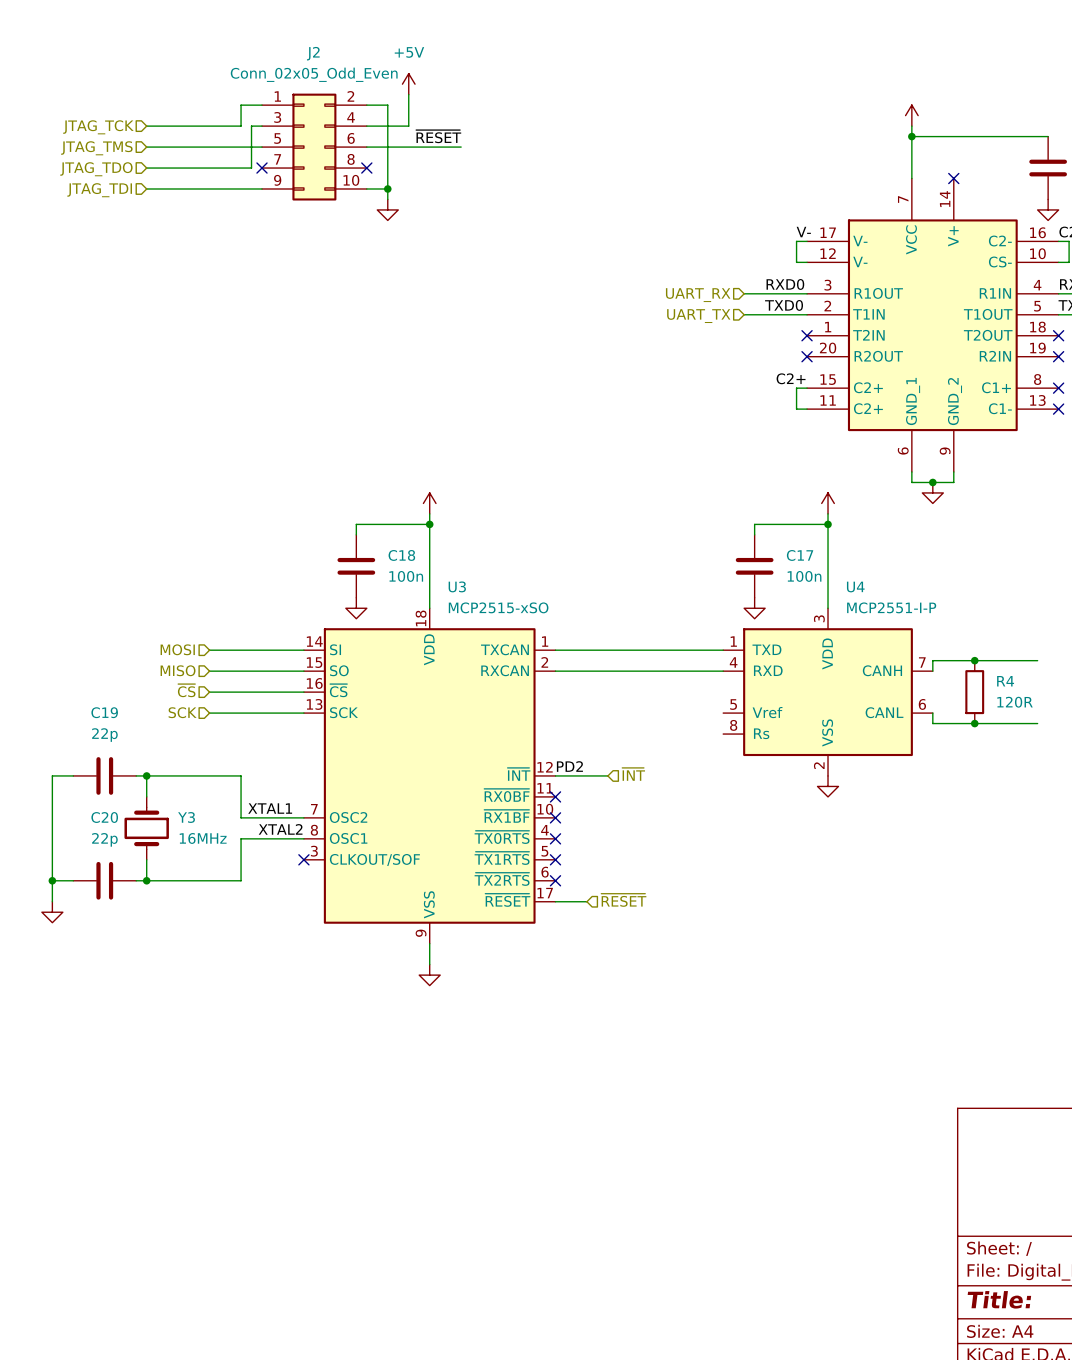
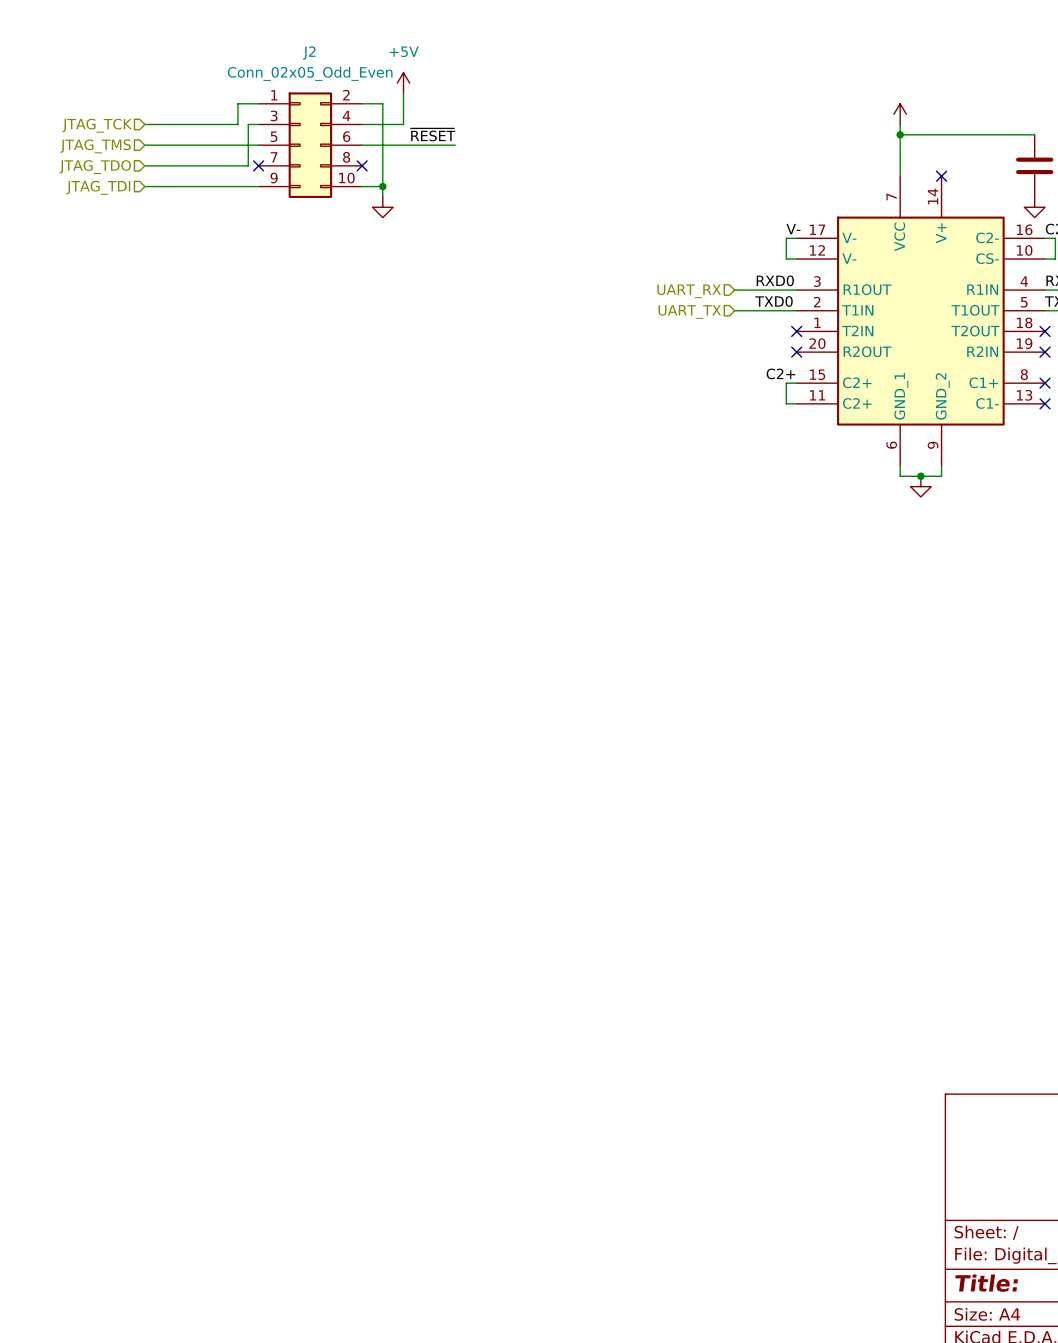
power symbol: (429, 503) -> none
power symbol: (828, 503) -> none
wire: (429, 513) (429, 608) -> none
wire: (828, 513) (828, 608) -> none
wire: (429, 524) (356, 524) (356, 534) -> none
junction: (429, 524) -> none
wire: (828, 524) (754, 524) (754, 534) -> none
junction: (828, 524) -> none
C18: 100n (356, 566) -> none
C17: 100n (754, 566) -> none
power symbol: (356, 608) -> none
power symbol: (754, 608) -> none
hierarchical label: MOSI (177, 649) -> none
wire: (209, 650) (303, 650) -> none
wire: (555, 650) (723, 650) -> none
junction: (974, 660) -> none
wire: (1037, 660) (932, 660) (932, 671) -> none
hierarchical label: MISO (178, 670) -> none
wire: (209, 671) (303, 671) -> none
wire: (555, 671) (723, 671) -> none
hierarchical label: ~{CS} (186, 690) -> none
wire: (209, 692) (303, 692) -> none
U4: MCP2551-I-P (828, 692) -> none
R4: 120R (974, 692) -> none
hierarchical label: SCK (182, 712) -> none
wire: (209, 713) (303, 713) -> none
wire: (932, 713) (932, 723) (1037, 723) -> none
junction: (974, 723) -> none
label: PD2 (569, 766) -> none
hierarchical label: ~{INT} (633, 774) -> none
wire: (73, 775) (52, 775) (52, 901) -> none
C19: 22p (104, 775) -> none
wire: (136, 775) (241, 775) (241, 817) (303, 817) -> none
wire: (146, 775) (146, 796) -> none
junction: (146, 775) -> none
U3: MCP2515-xSO (429, 775) -> none
wire: (555, 775) (607, 775) -> none
power symbol: (828, 786) -> none
no-connect mark: (555, 796) -> none
label: XTAL1 (270, 808) -> none
no-connect mark: (555, 817) -> none
Y3: 16MHz (146, 828) -> none
label: XTAL2 (280, 829) -> none
wire: (303, 838) (241, 838) (241, 880) (136, 880) -> none
no-connect mark: (555, 838) -> none
wire: (146, 859) (146, 880) -> none
no-connect mark: (303, 859) -> none
no-connect mark: (555, 859) -> none
wire: (52, 880) (73, 880) -> none
junction: (52, 880) -> none
C20: 22p (104, 880) -> none
junction: (146, 880) -> none
no-connect mark: (555, 880) -> none
hierarchical label: ~{RESET} (623, 900) -> none
wire: (555, 901) (586, 901) -> none
power symbol: (52, 912) -> none
wire: (429, 943) (429, 964) -> none
power symbol: (429, 975) -> none

